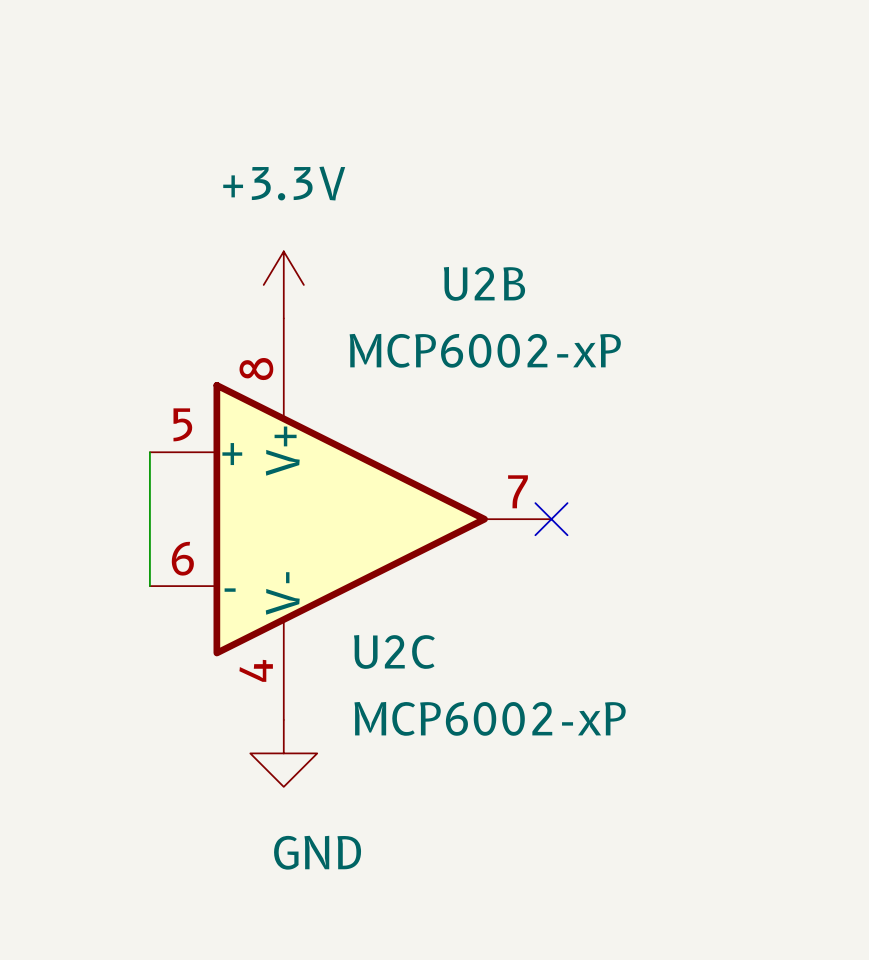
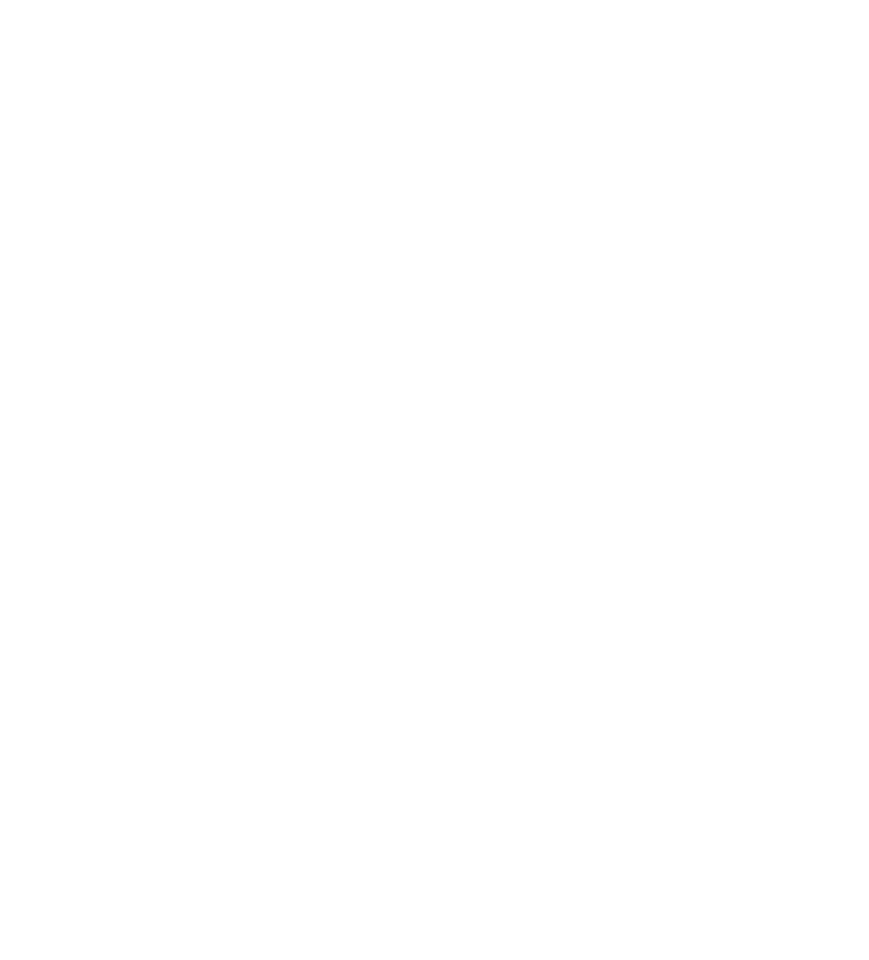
power symbol: +3.3V (283, 284) -> none
wire: (149, 452) (149, 586) -> none
U2C: MCP6002-xP (283, 519) -> none
U2B: MCP6002-xP (350, 519) -> none
no-connect mark: (551, 519) -> none
power symbol: GND (283, 753) -> none

